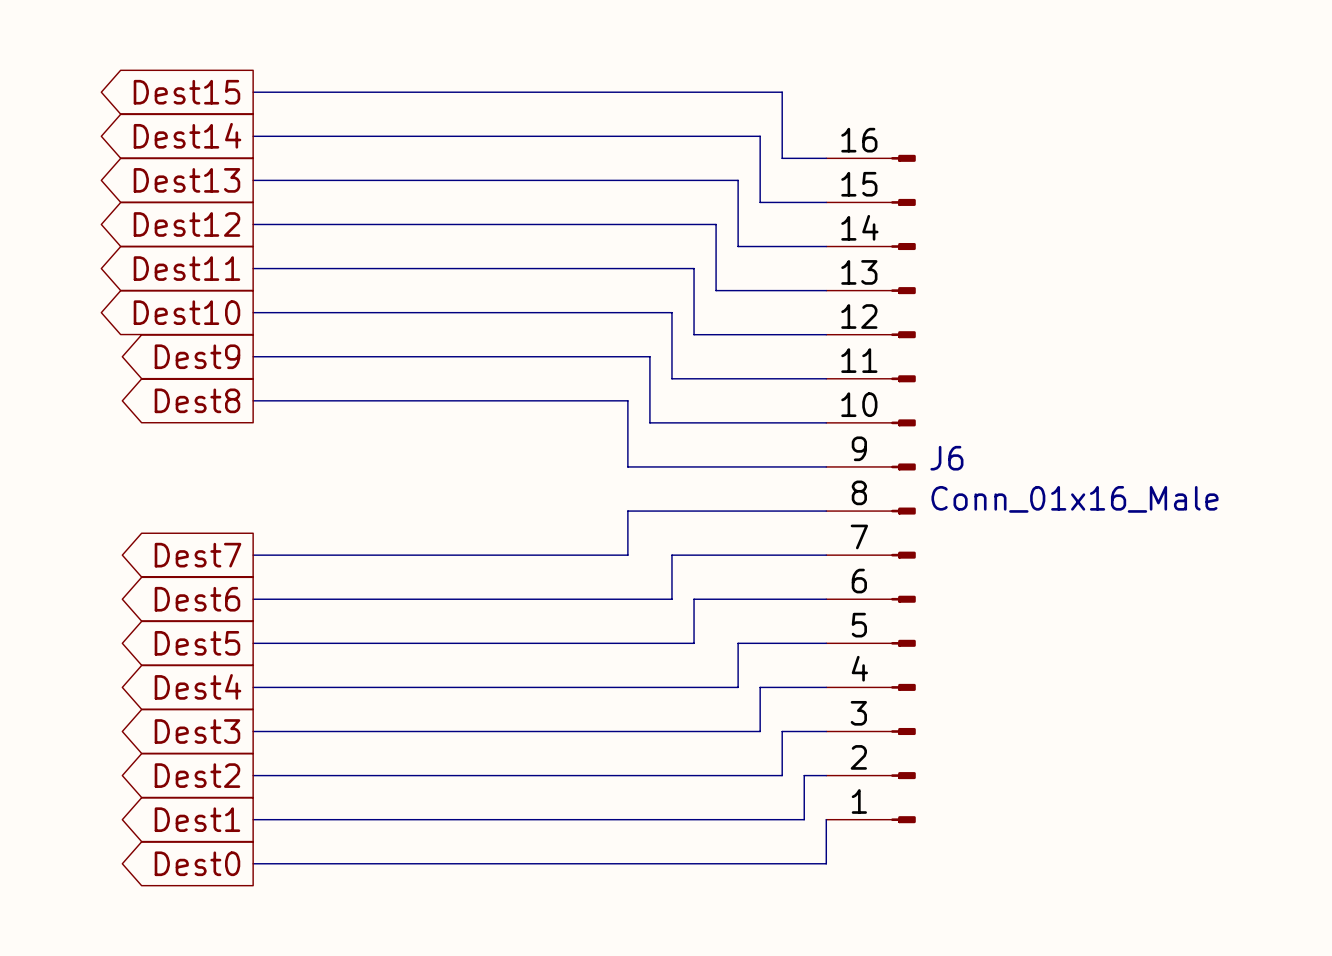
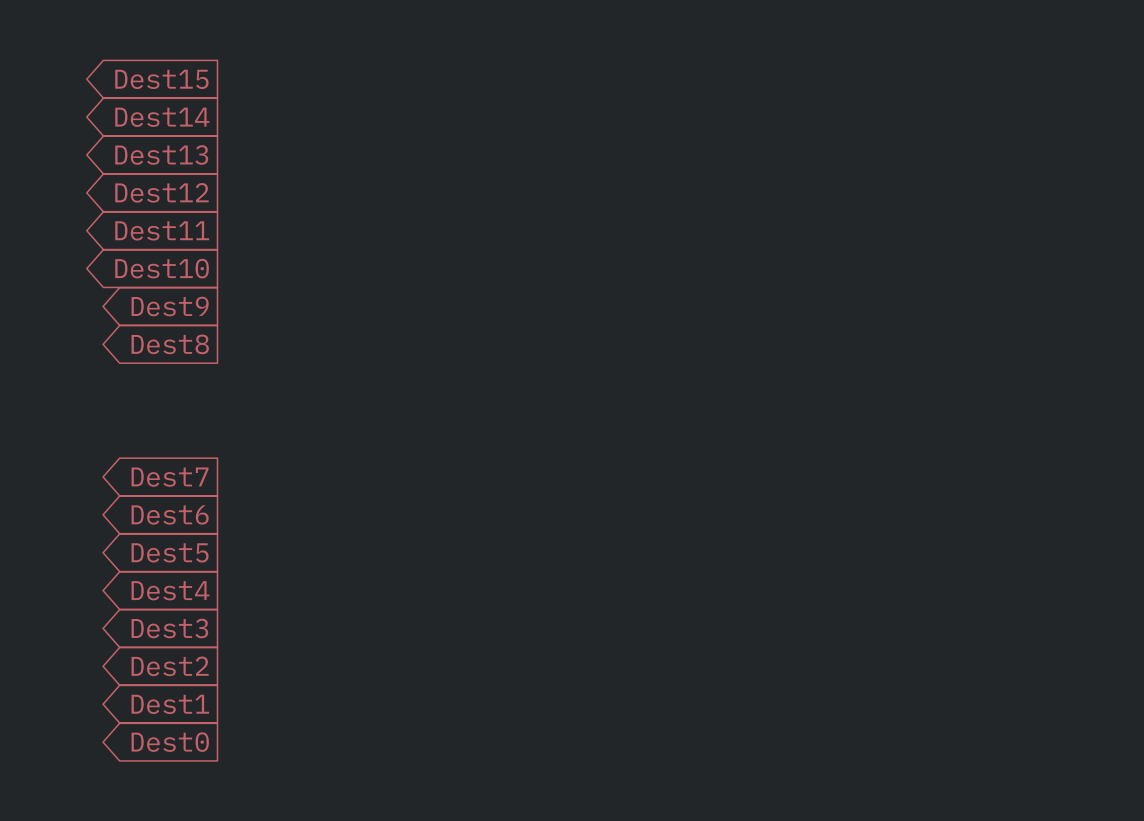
wire: (253, 92) (782, 92) (782, 158) (826, 158) -> none
wire: (253, 136) (760, 136) (760, 202) (826, 202) -> none
wire: (253, 180) (738, 180) (738, 246) (826, 246) -> none
wire: (253, 224) (716, 224) (716, 290) (826, 290) -> none
wire: (253, 268) (694, 268) (694, 334) (826, 334) -> none
wire: (253, 312) (671, 312) (671, 378) (826, 378) -> none
wire: (253, 356) (649, 356) (649, 422) (826, 422) -> none
wire: (253, 400) (627, 400) (627, 466) (826, 466) -> none
J6: Conn_01x16_Male (871, 489) -> none
wire: (826, 511) (627, 511) (627, 555) (253, 555) -> none
wire: (826, 555) (671, 555) (671, 599) (253, 599) -> none
wire: (826, 599) (694, 599) (694, 643) (253, 643) -> none
wire: (826, 643) (738, 643) (738, 687) (253, 687) -> none
wire: (826, 687) (760, 687) (760, 731) (253, 731) -> none
wire: (826, 731) (782, 731) (782, 775) (253, 775) -> none
wire: (826, 775) (804, 775) (804, 819) (253, 819) -> none
wire: (826, 819) (826, 863) (253, 863) -> none

